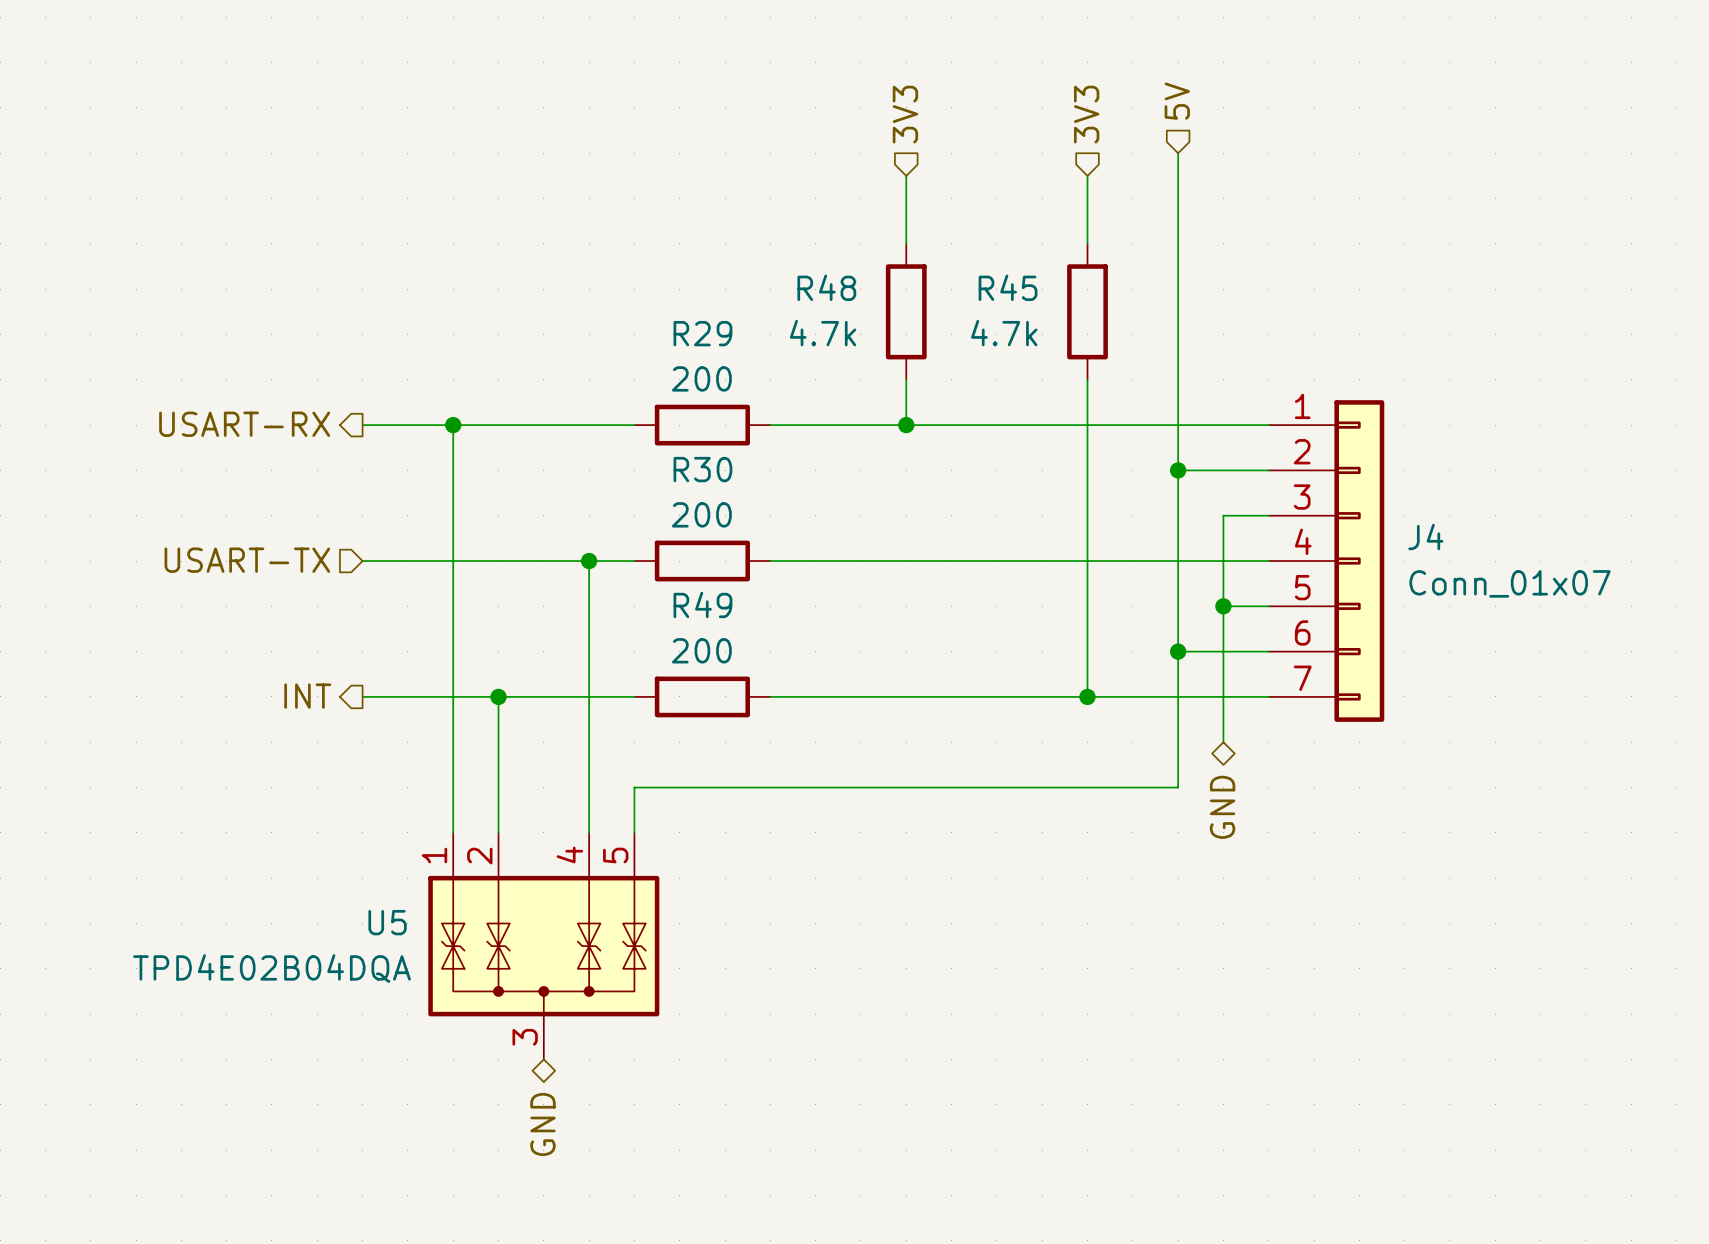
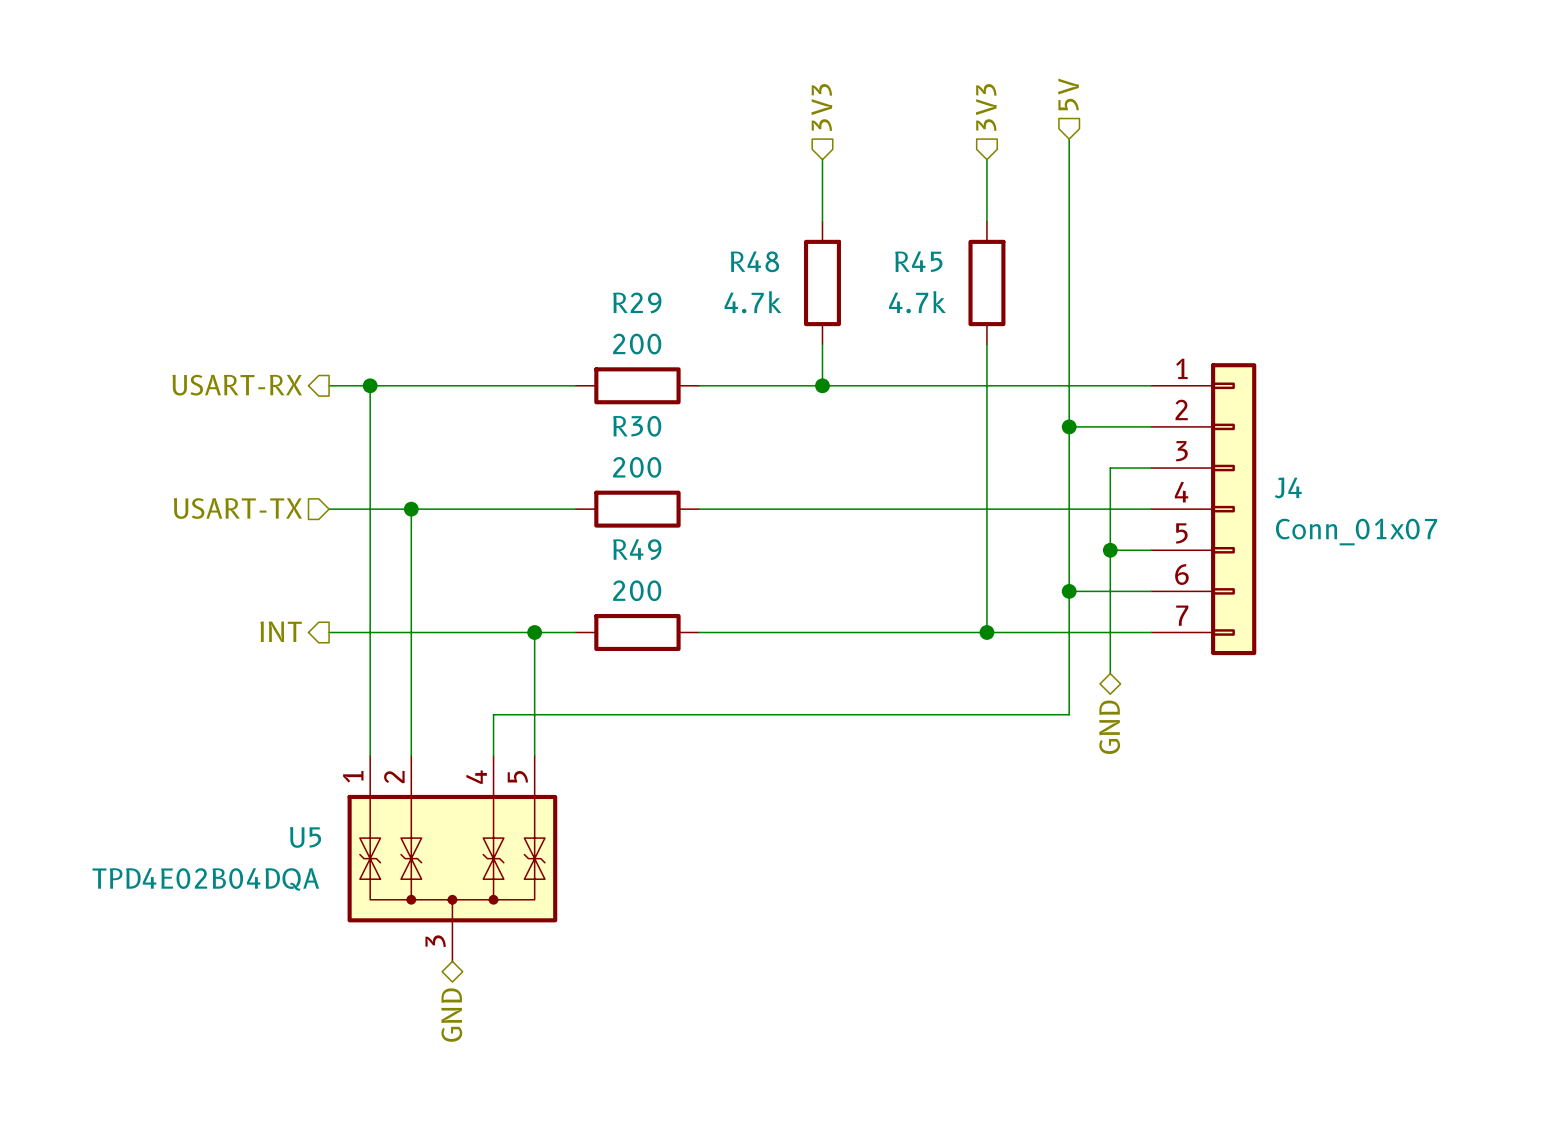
wire: none -> (370, 385) (370, 755)
wire: (453, 425) (453, 561) -> none
junction position: (453, 425) -> (370, 385)
junction: none -> (411, 509)
wire: (589, 561) (589, 696) -> none
junction: (589, 561) -> none
wire: (498, 696) (498, 832) -> none
junction: (498, 696) -> none
junction: none -> (534, 632)
wire: (634, 787) (634, 832) -> (575, 714) (493, 714) (493, 755)
U5 position: (543, 946) -> (452, 858)
hierarchical label position: GND (542, 1124) -> GND (451, 1015)

